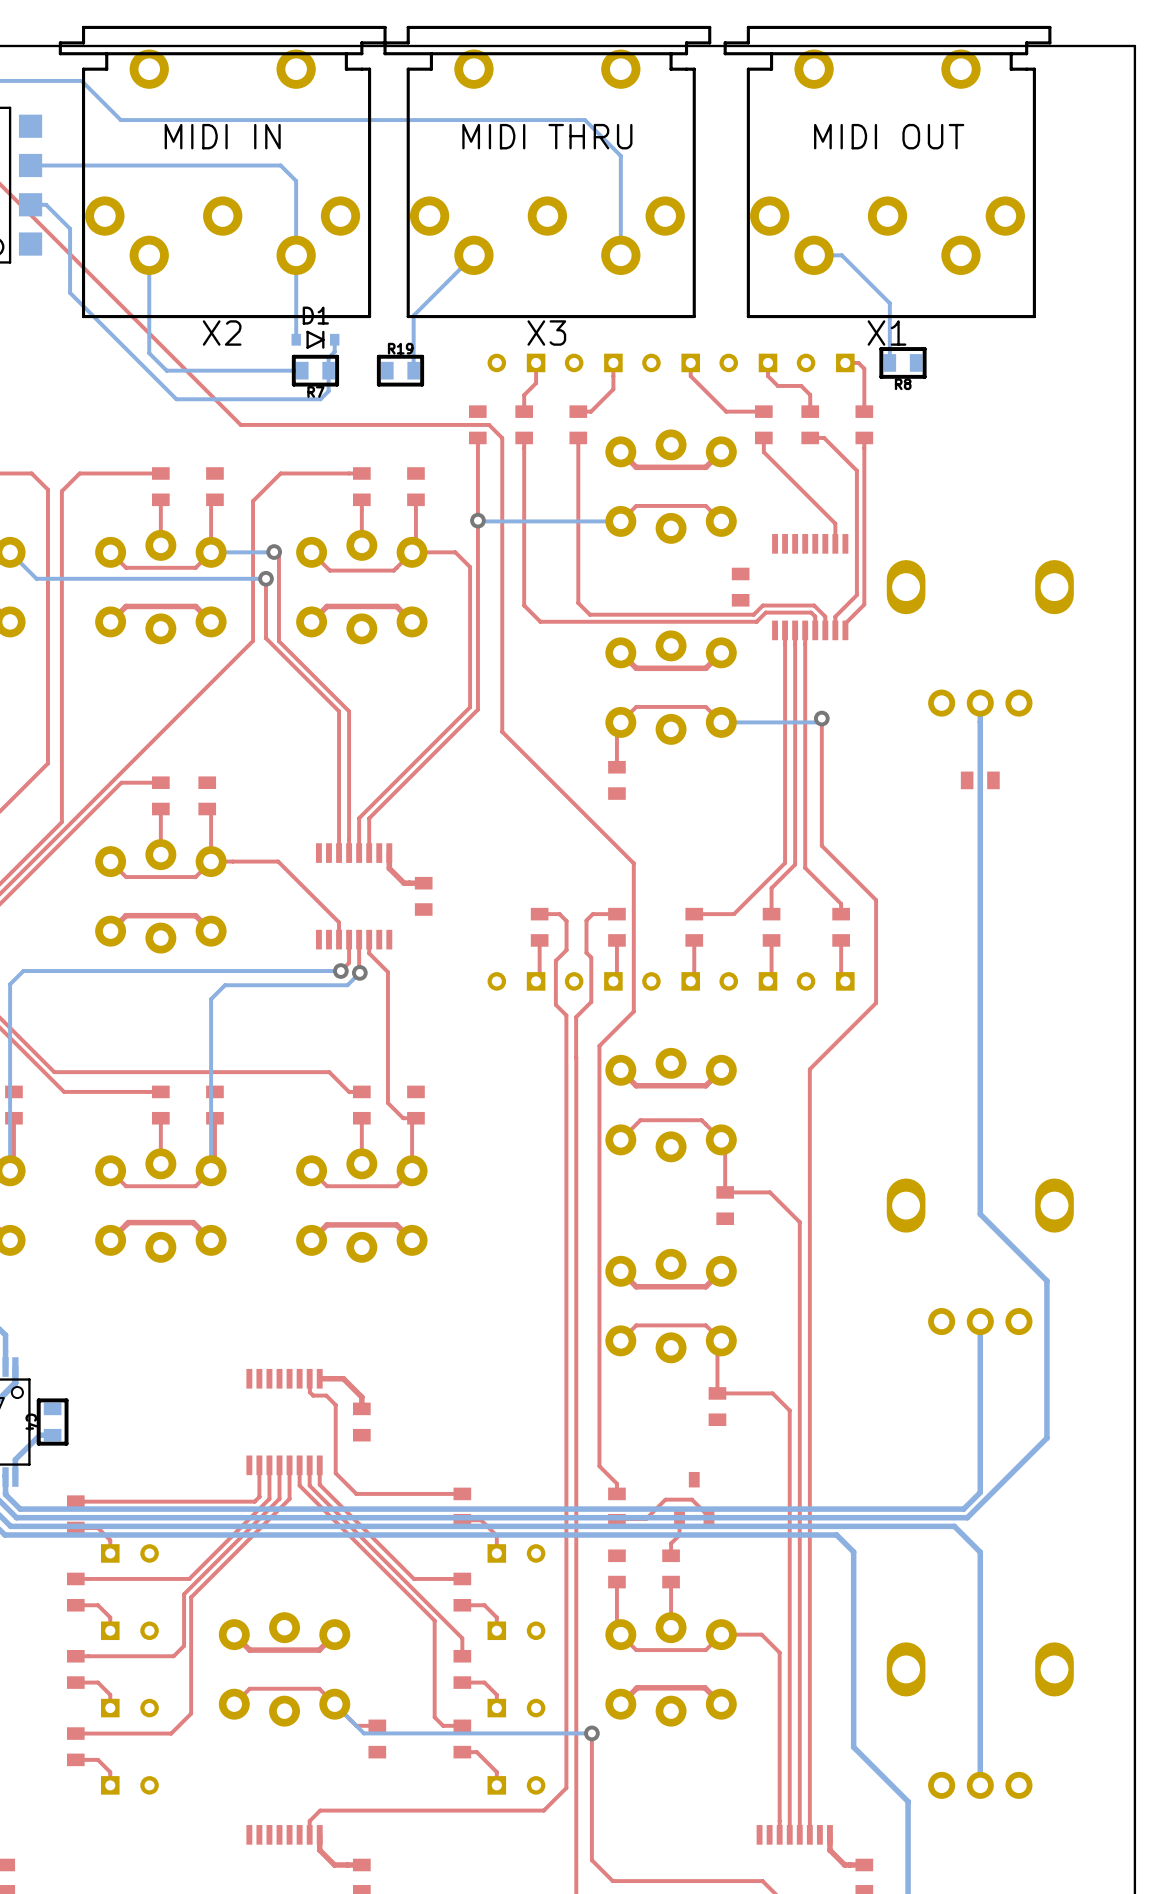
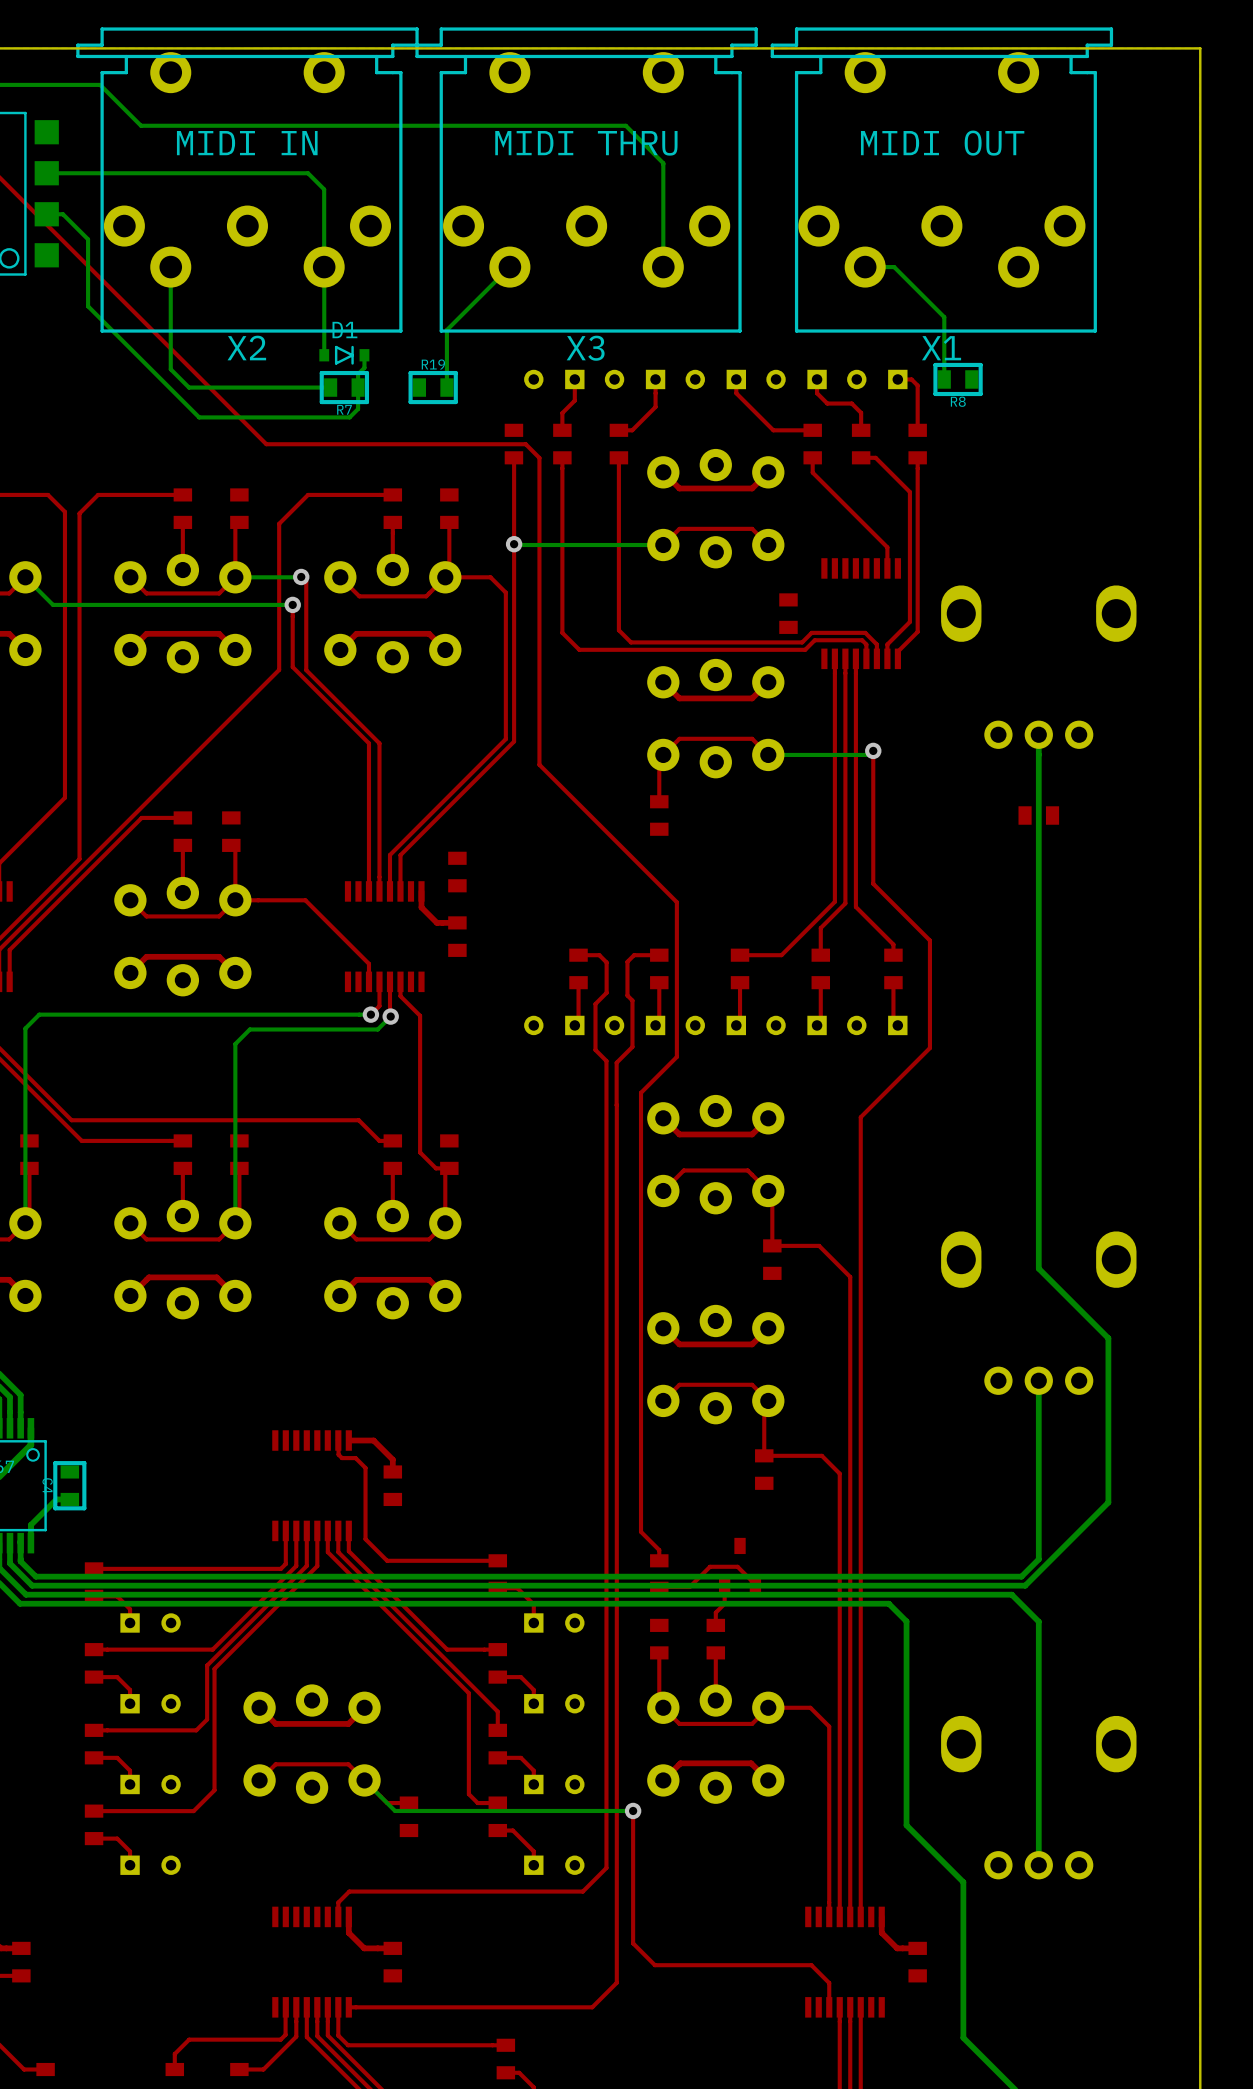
part: none -> (457, 872)

